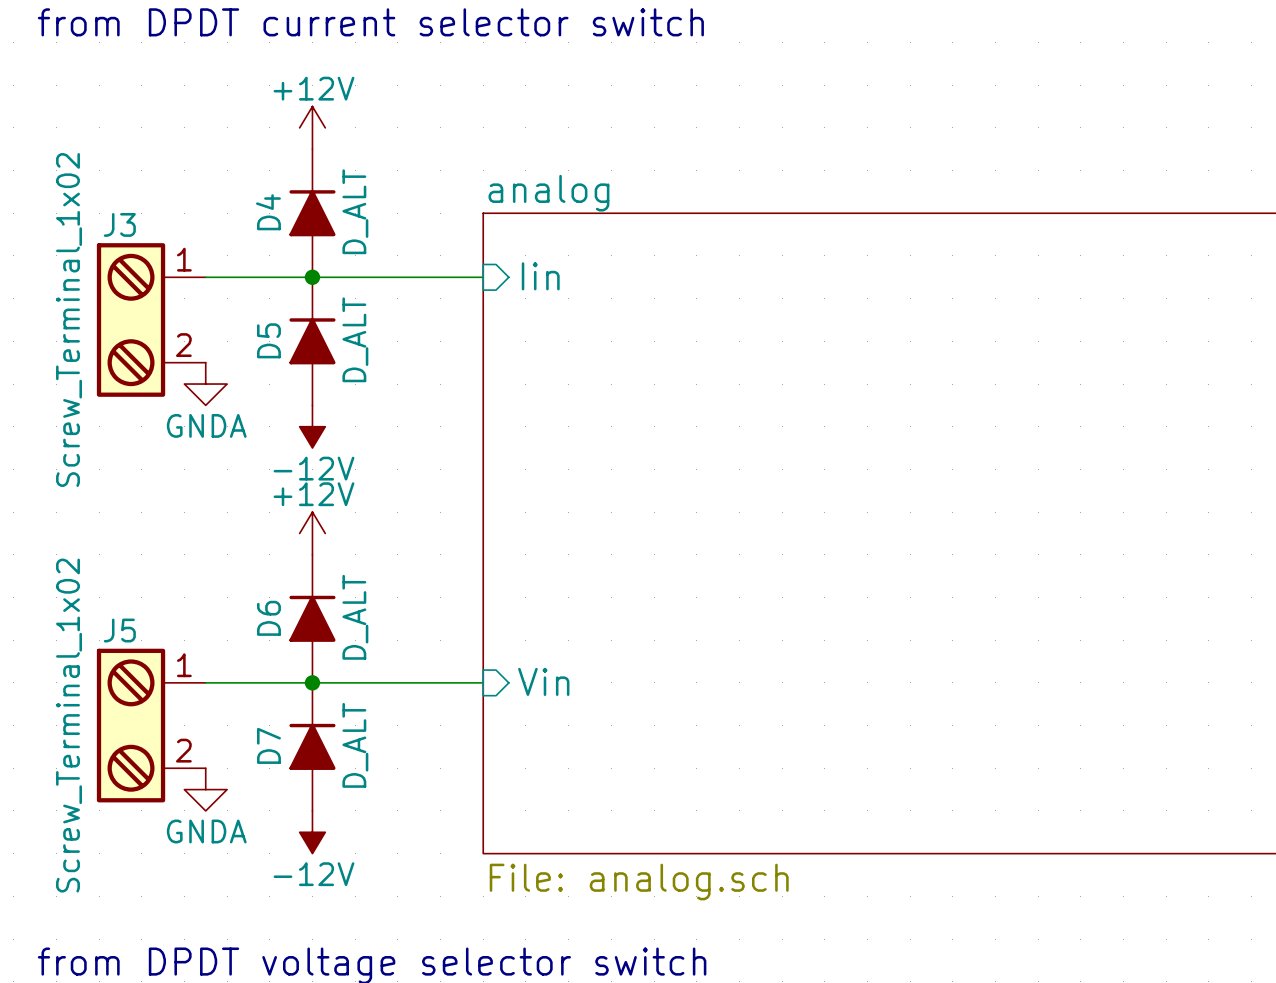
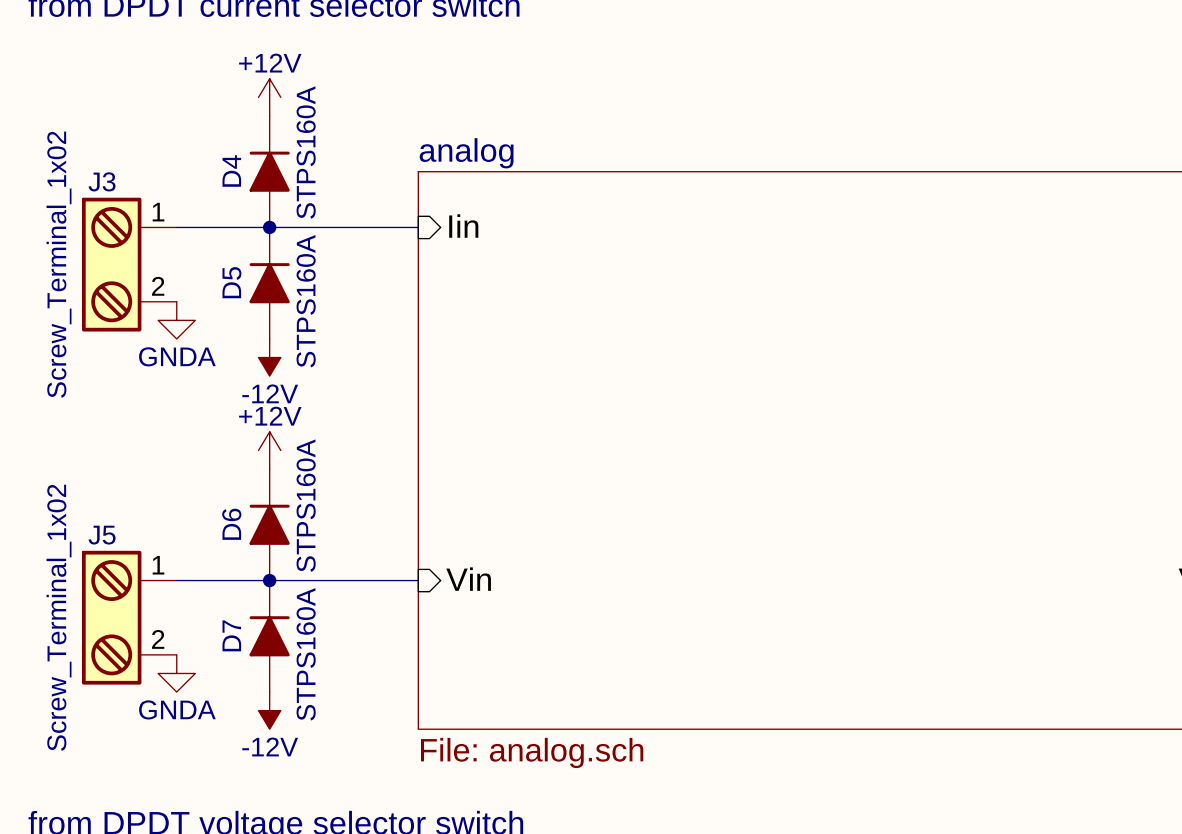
D4 value: D_ALT (355, 211) -> STPS160A (306, 152)
D5 value: D_ALT (355, 339) -> STPS160A (306, 301)
D6 value: D_ALT (355, 617) -> STPS160A (306, 505)
D7 value: D_ALT (355, 745) -> STPS160A (306, 654)

